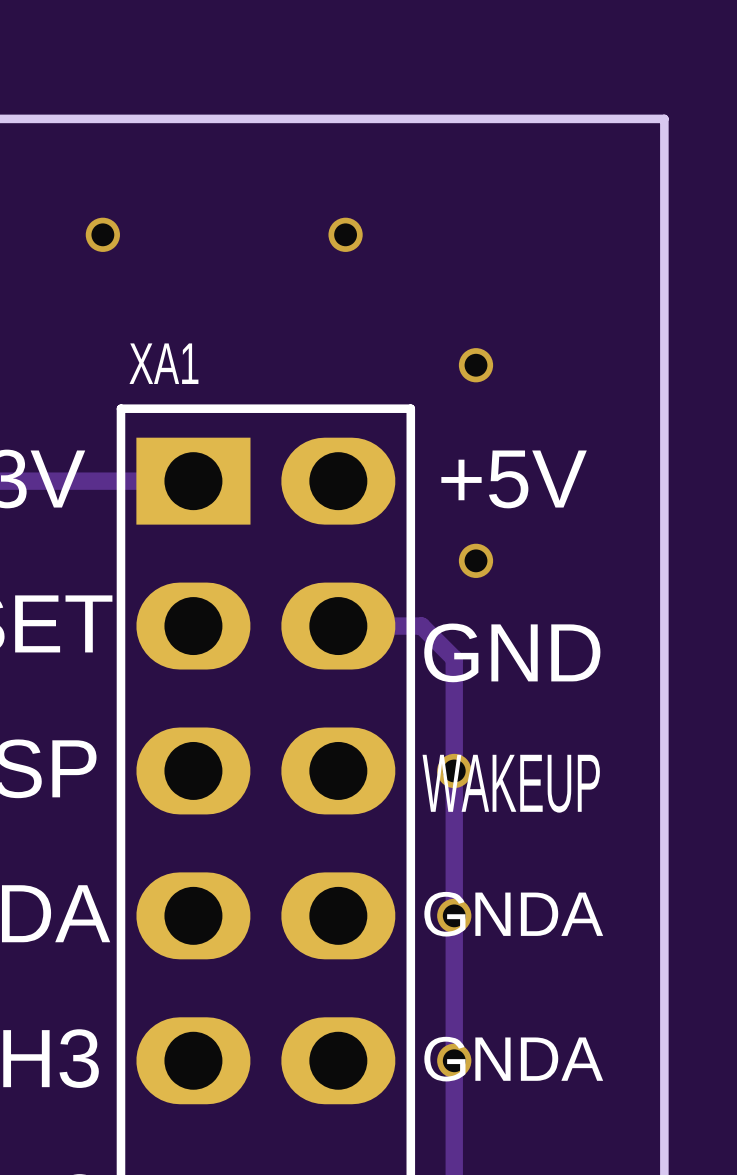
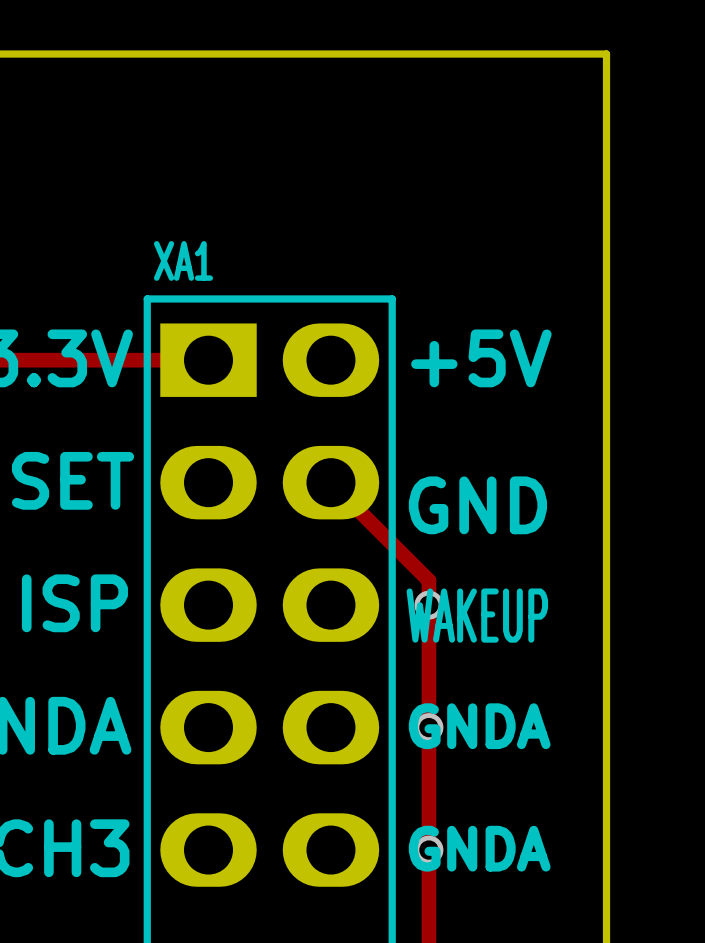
via: (102, 234) -> none
via: (345, 234) -> none
via: (475, 365) -> none
via: (475, 560) -> none
track: (338, 626) (421, 626) (454, 658) (454, 741) -> (330, 482) (428, 580)

